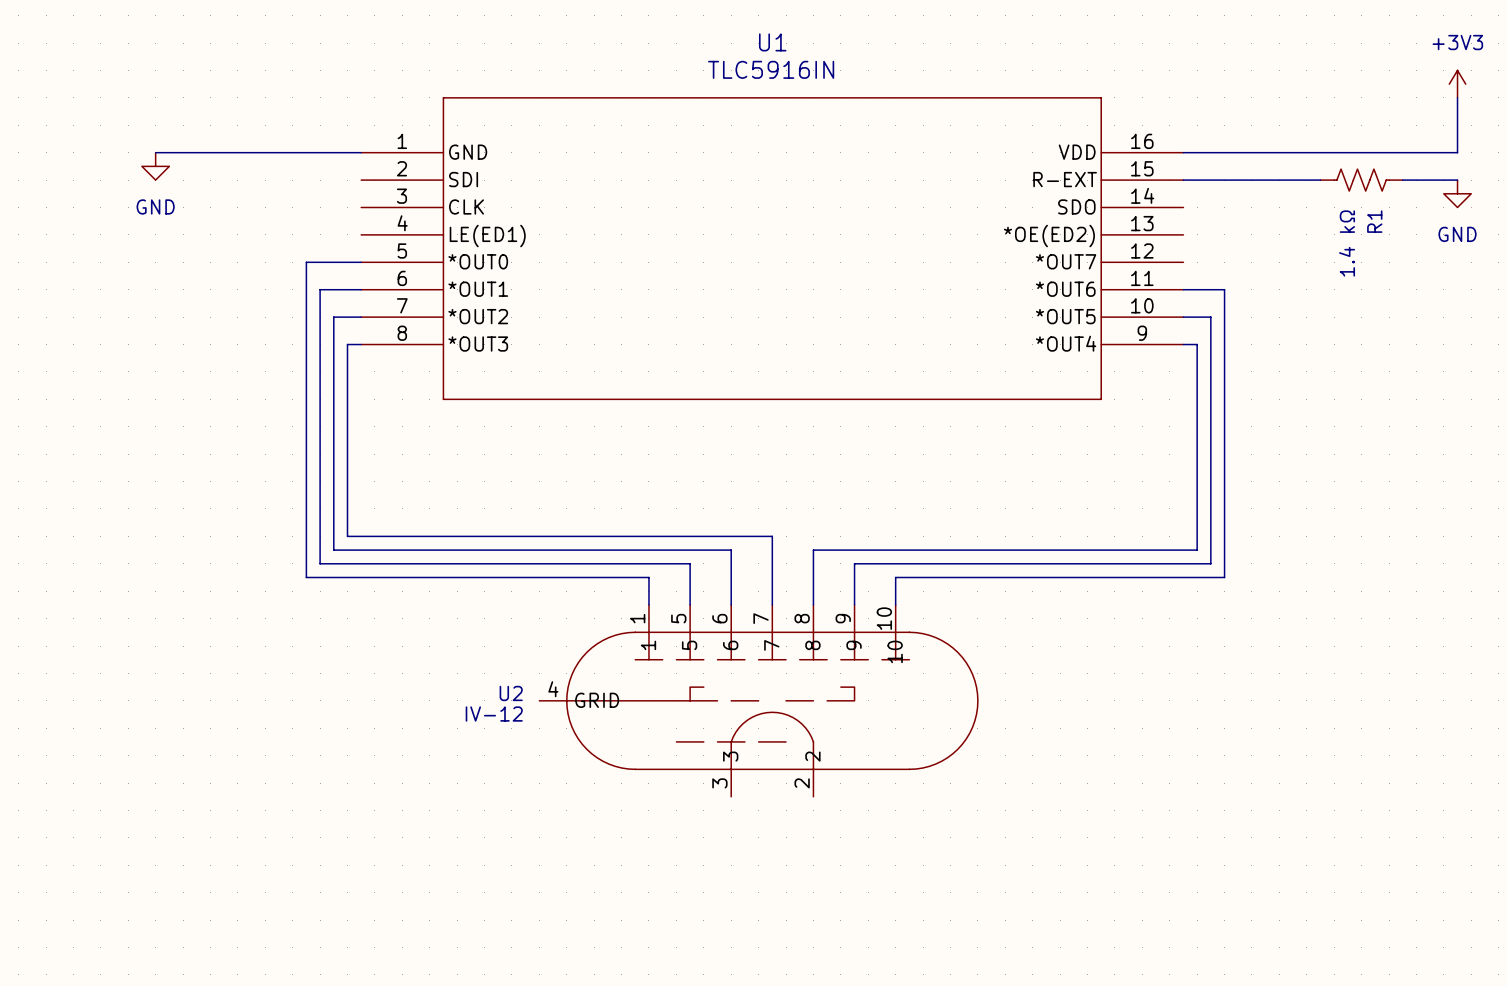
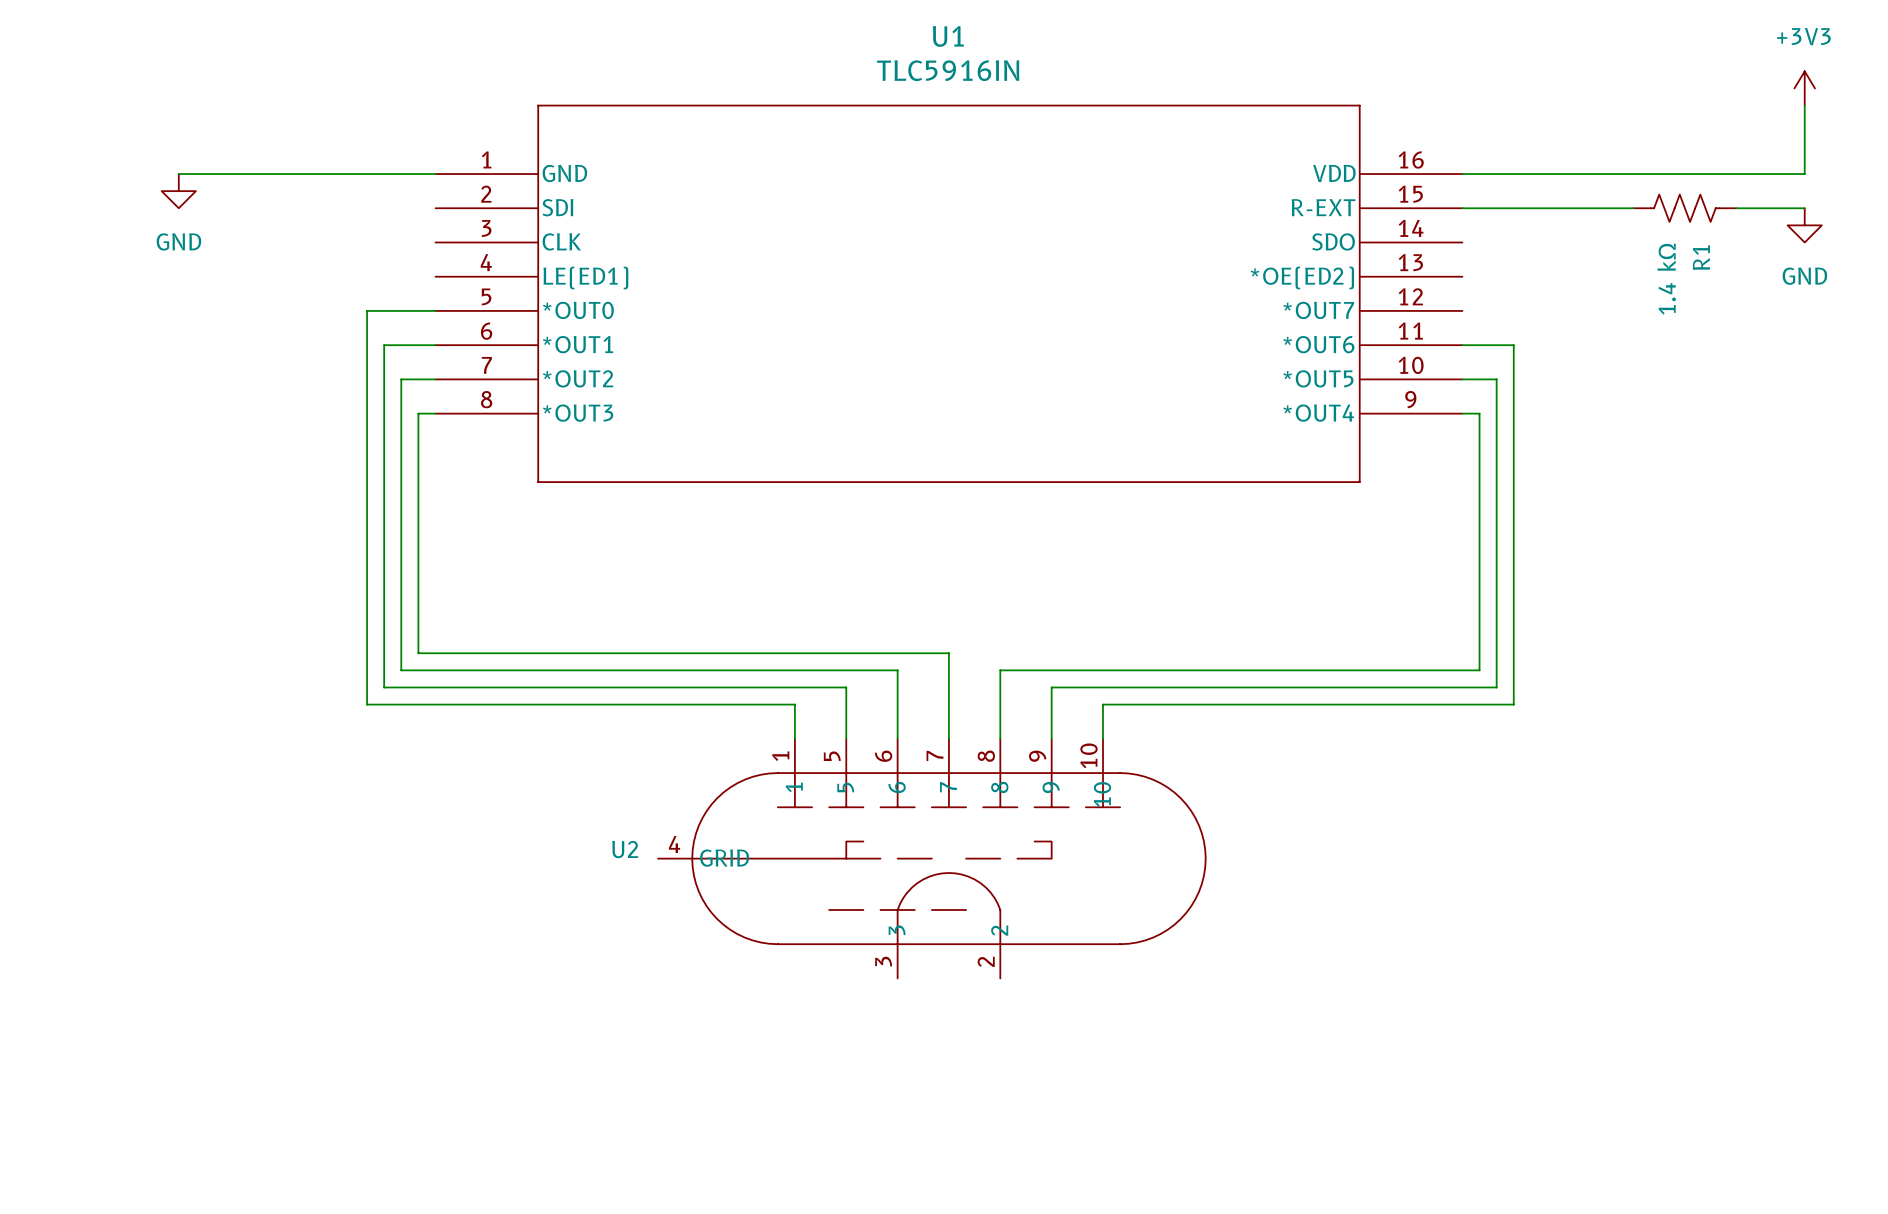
U2 value: IV-12 (494, 714) -> none

